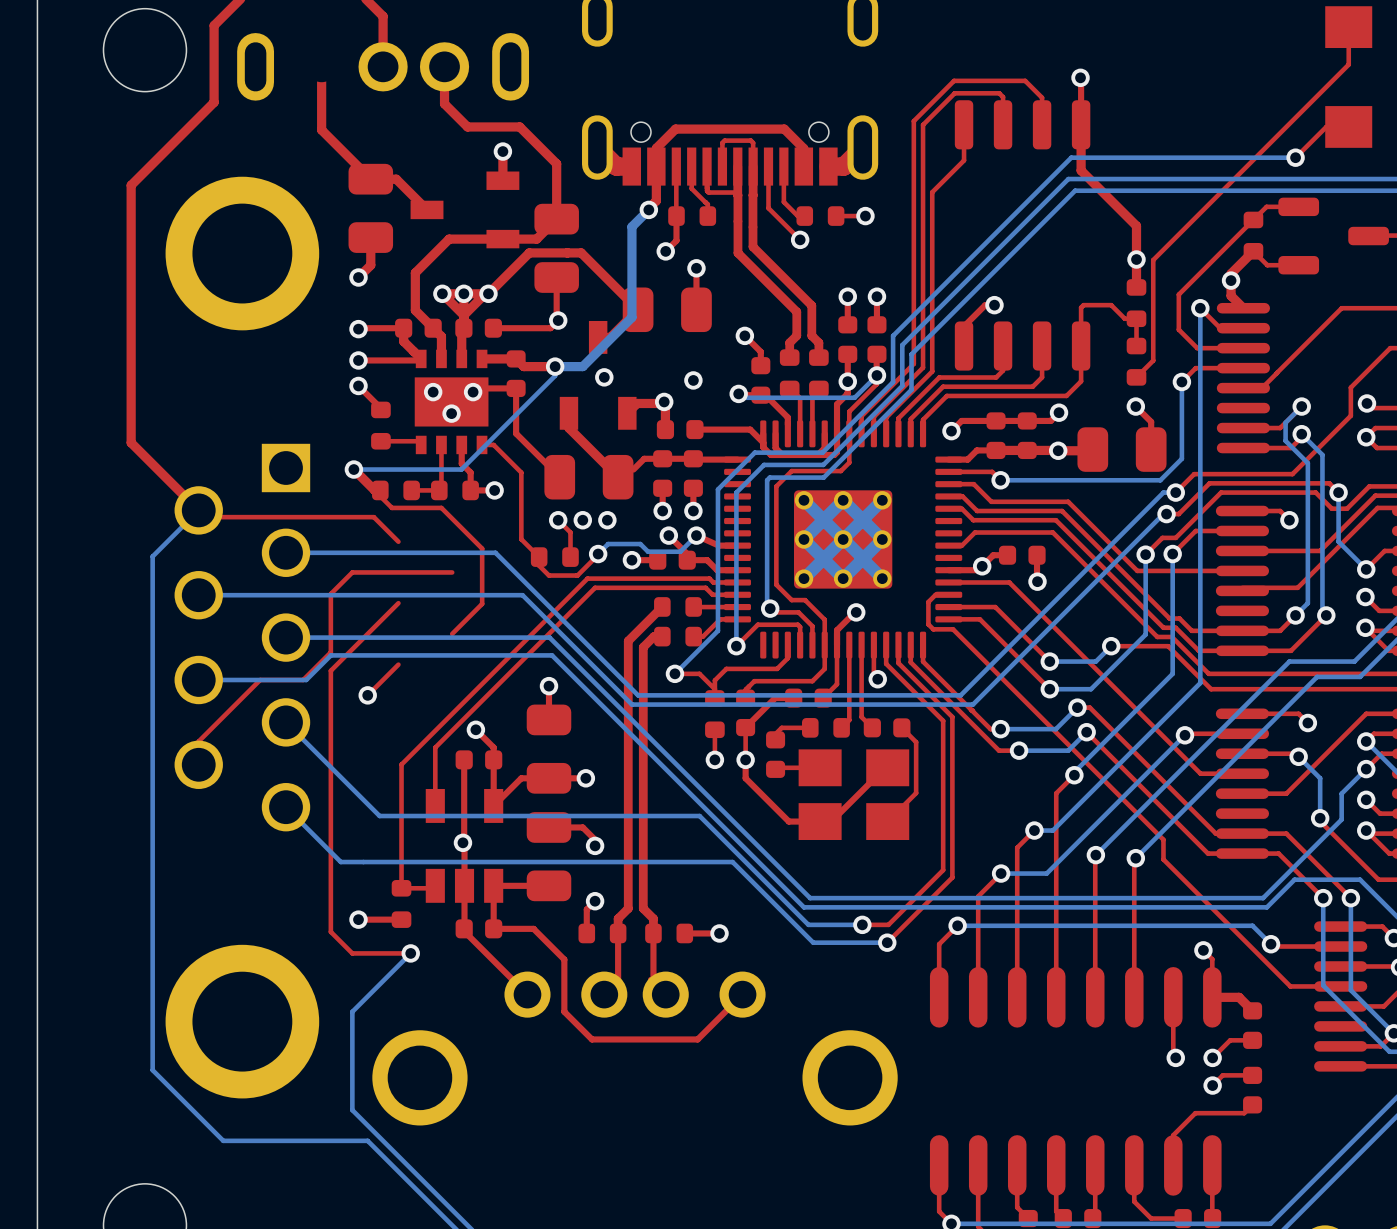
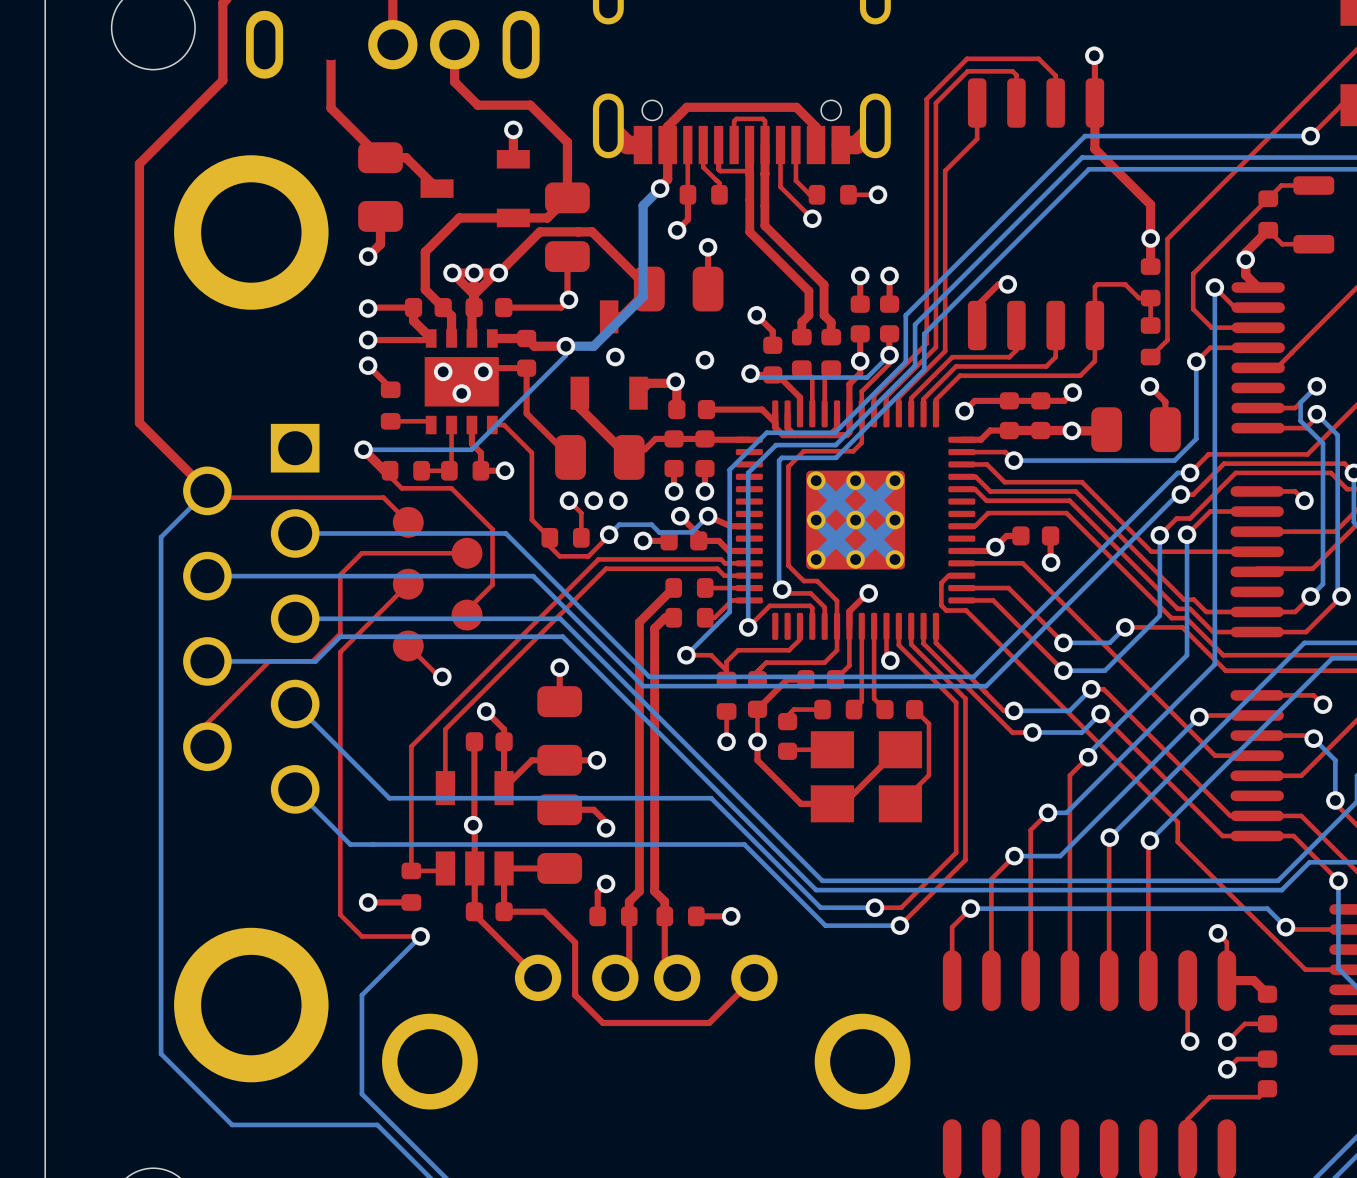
part: none -> (408, 522)
part: none -> (467, 553)
part: none -> (408, 584)
part: none -> (467, 615)
top track: (398, 664) (367, 695) -> (408, 645) (439, 676) (442, 676)
part: none -> (408, 645)
via position: (367, 695) -> (442, 676)

